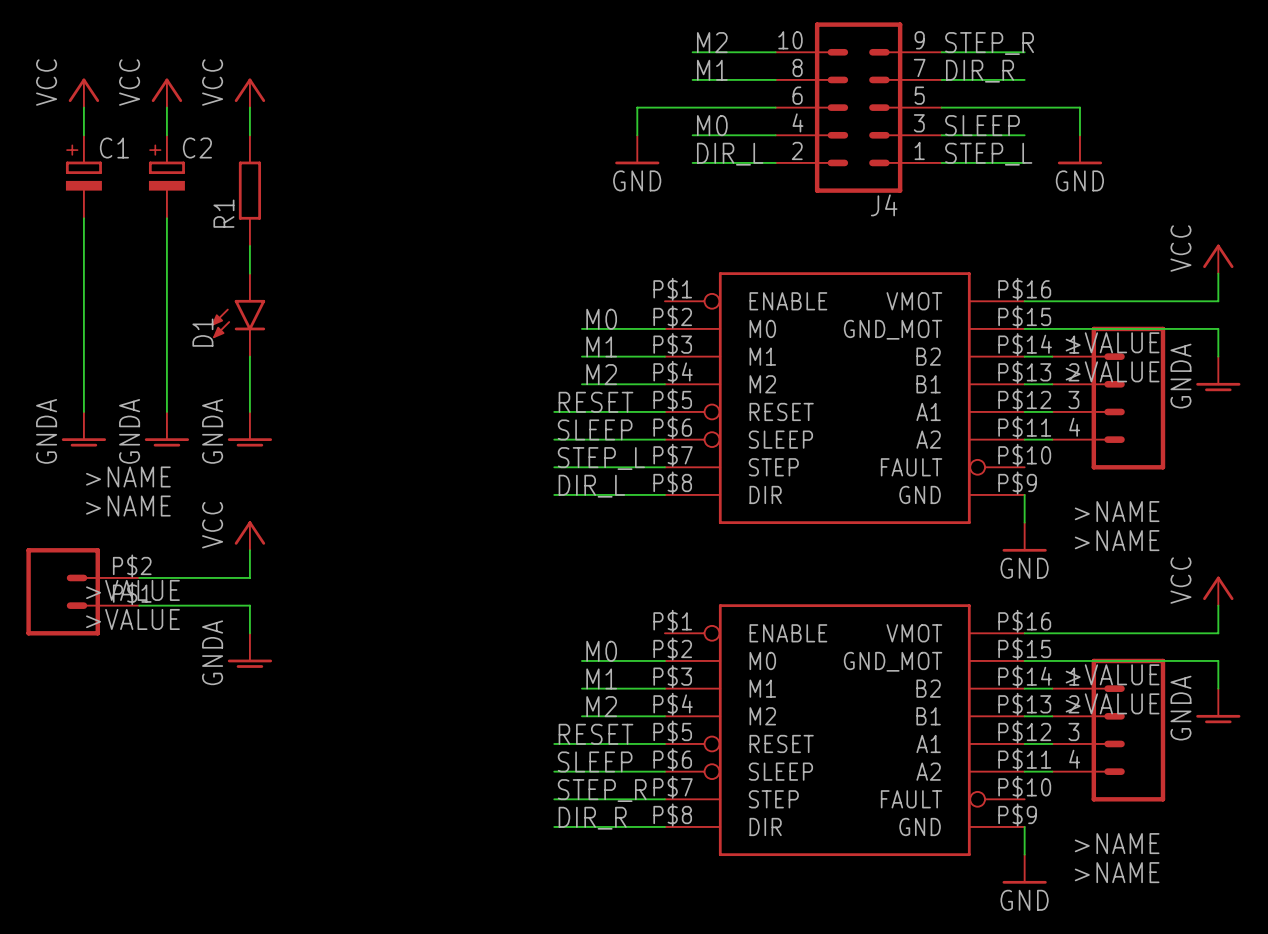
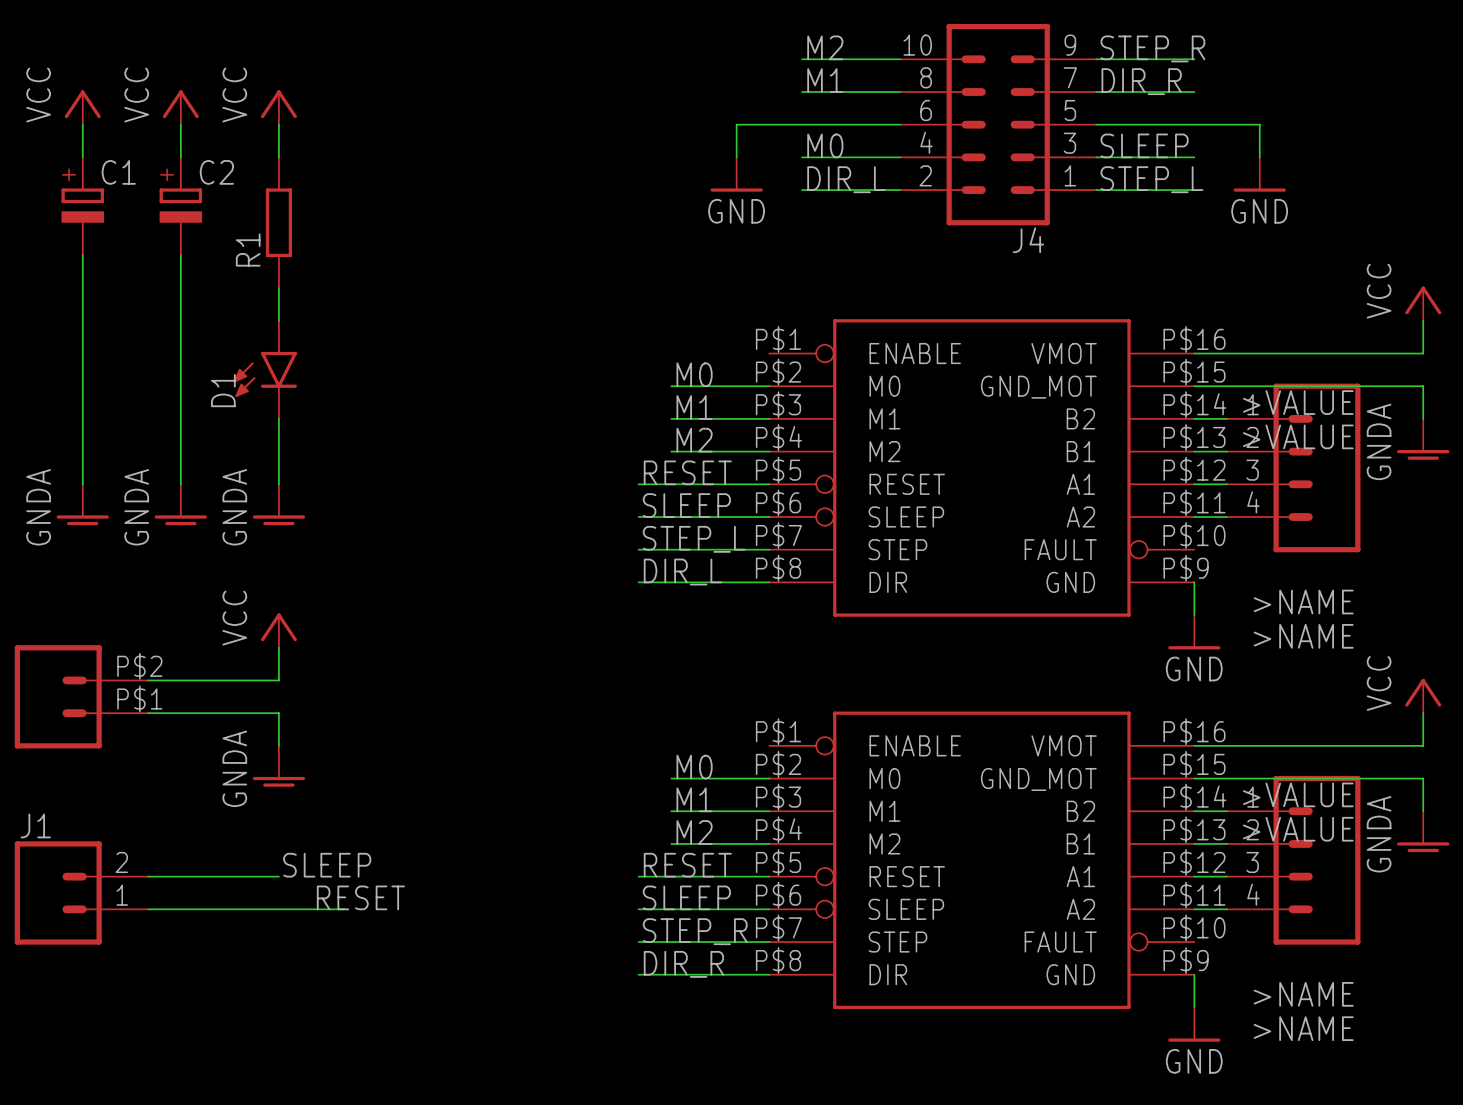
part text: >NAME (128, 476) -> none
part text: >NAME (128, 506) -> none
part text: >VALUE (132, 590) -> none
part text: >VALUE (132, 619) -> none
label: none -> SLEEP (327, 865)
wire: none -> (148, 876) (278, 876)
J1: none -> (81, 892)
label: none -> RESET (360, 897)
wire: none -> (148, 909) (344, 909)

